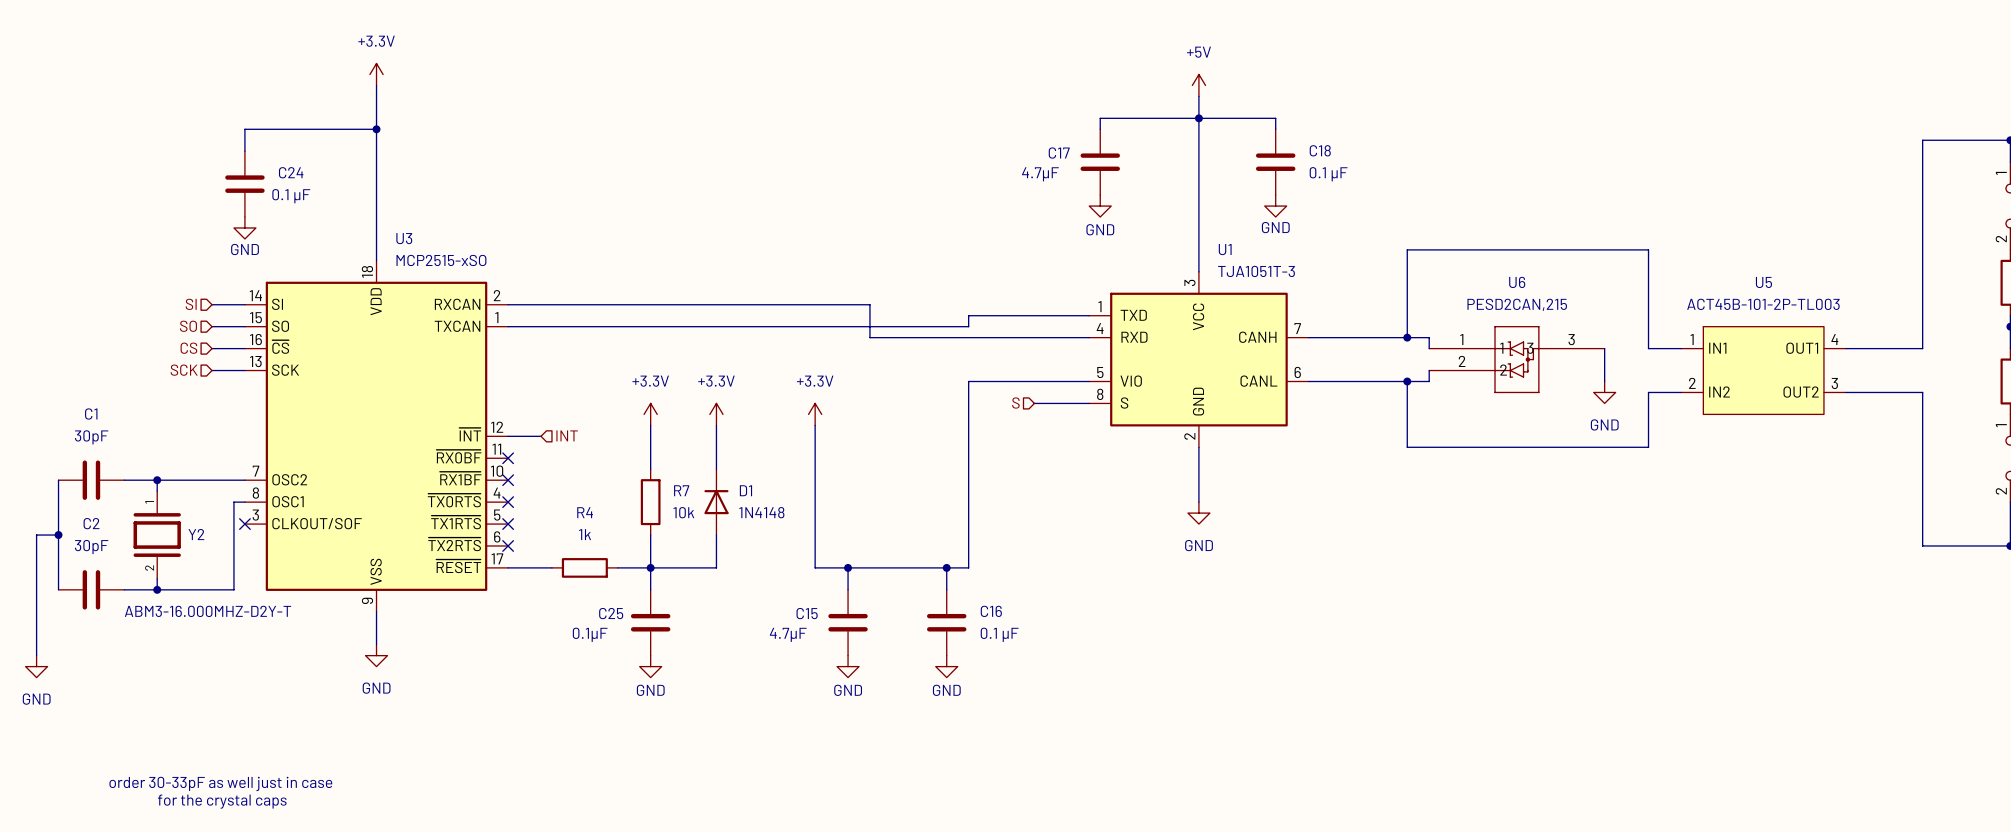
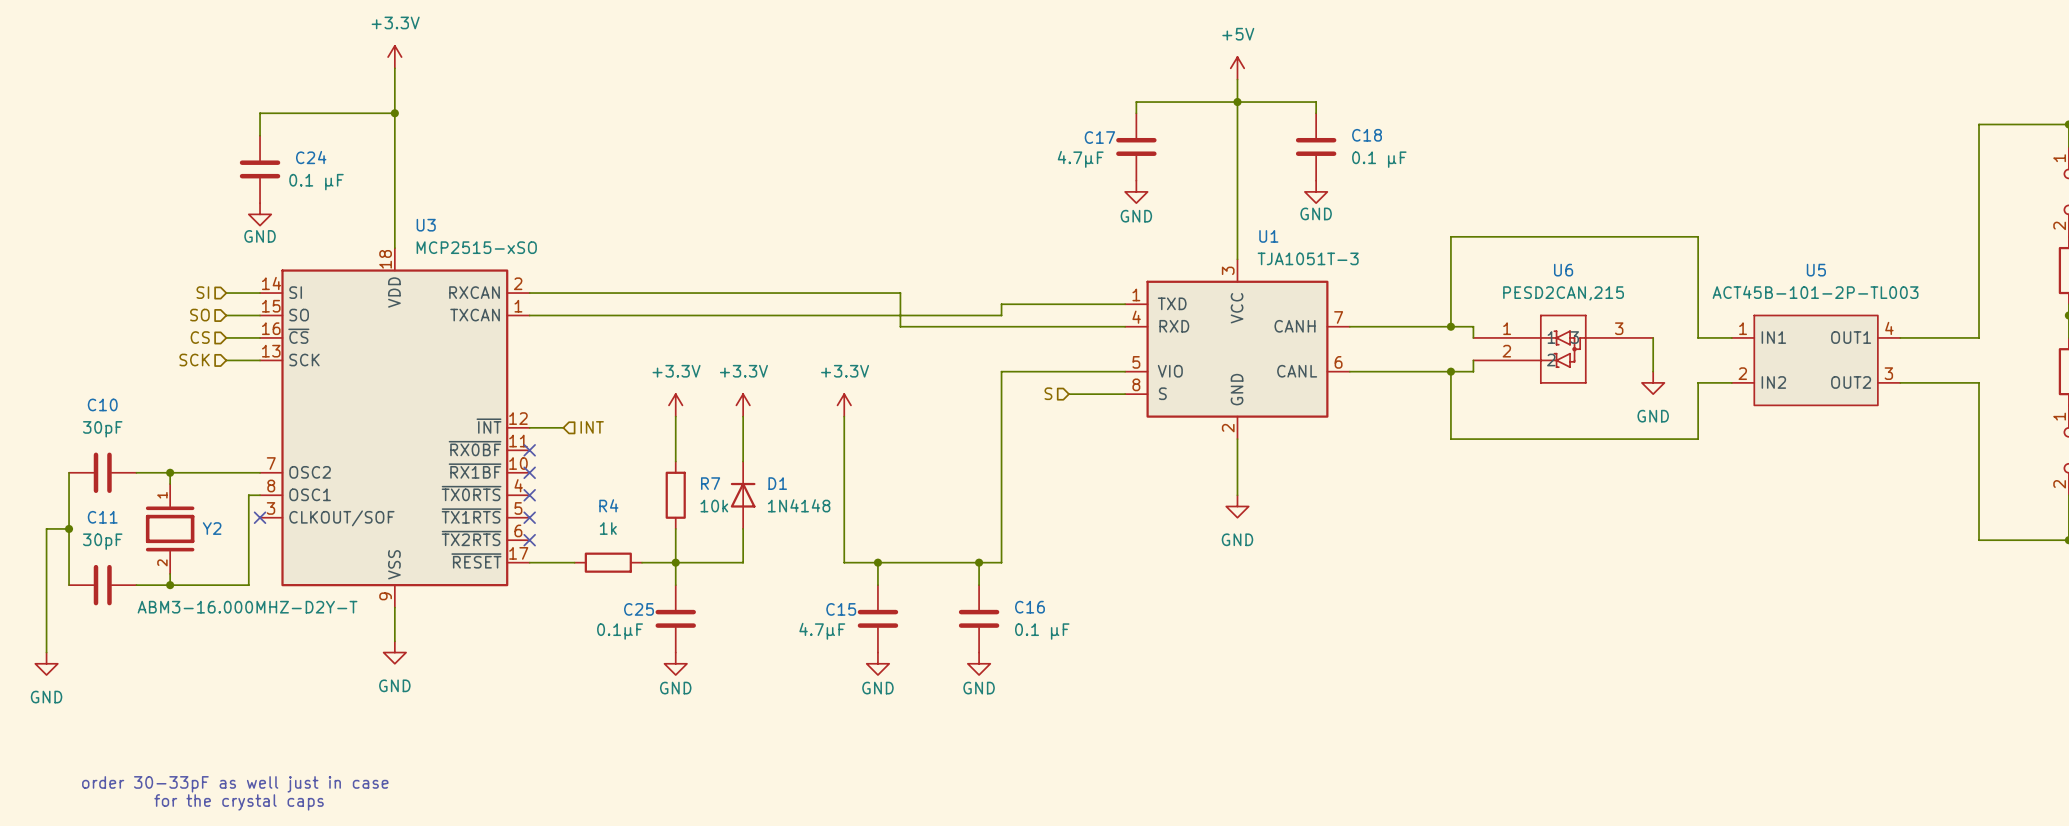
C1 name: C1 (91, 414) -> C10 (102, 404)
C2 name: C2 (91, 523) -> C11 (102, 517)

